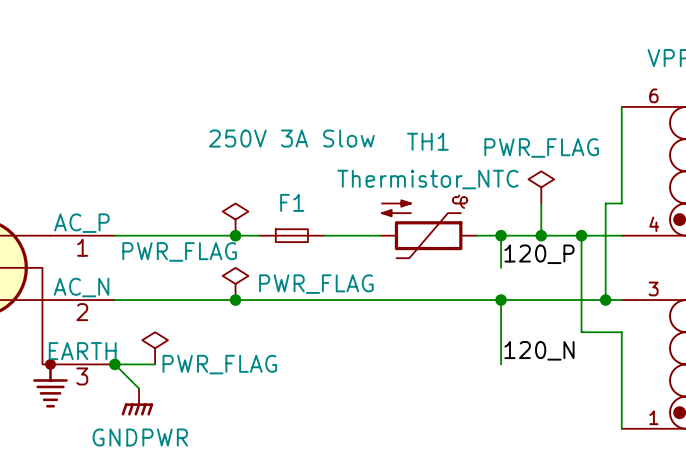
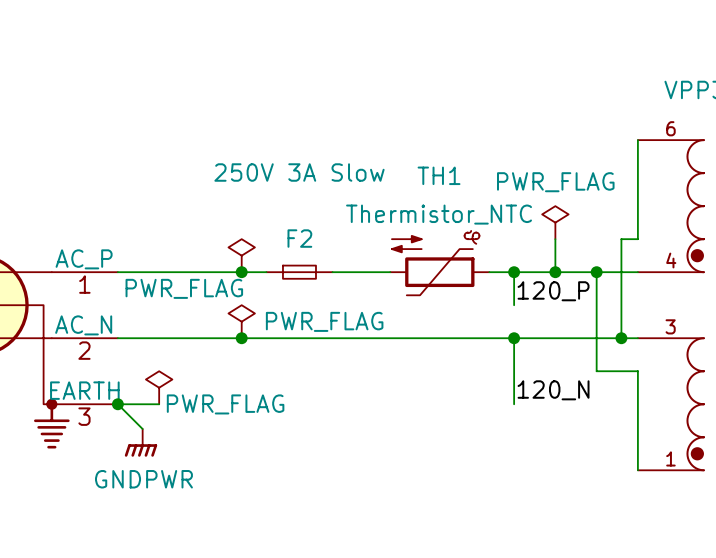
F1 name: F1 (292, 202) -> F2 (299, 238)

